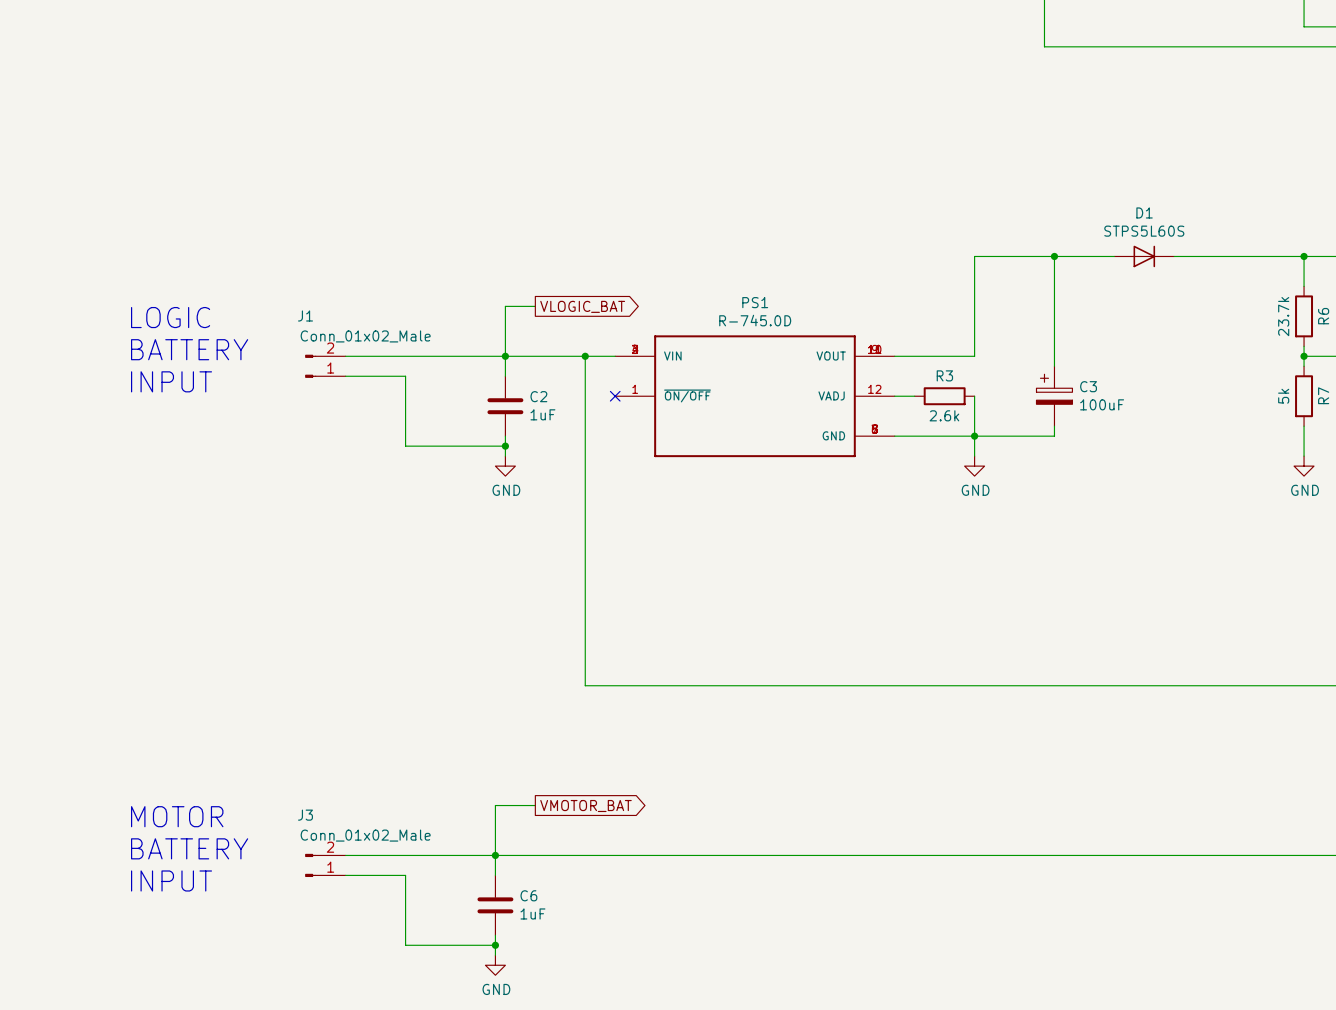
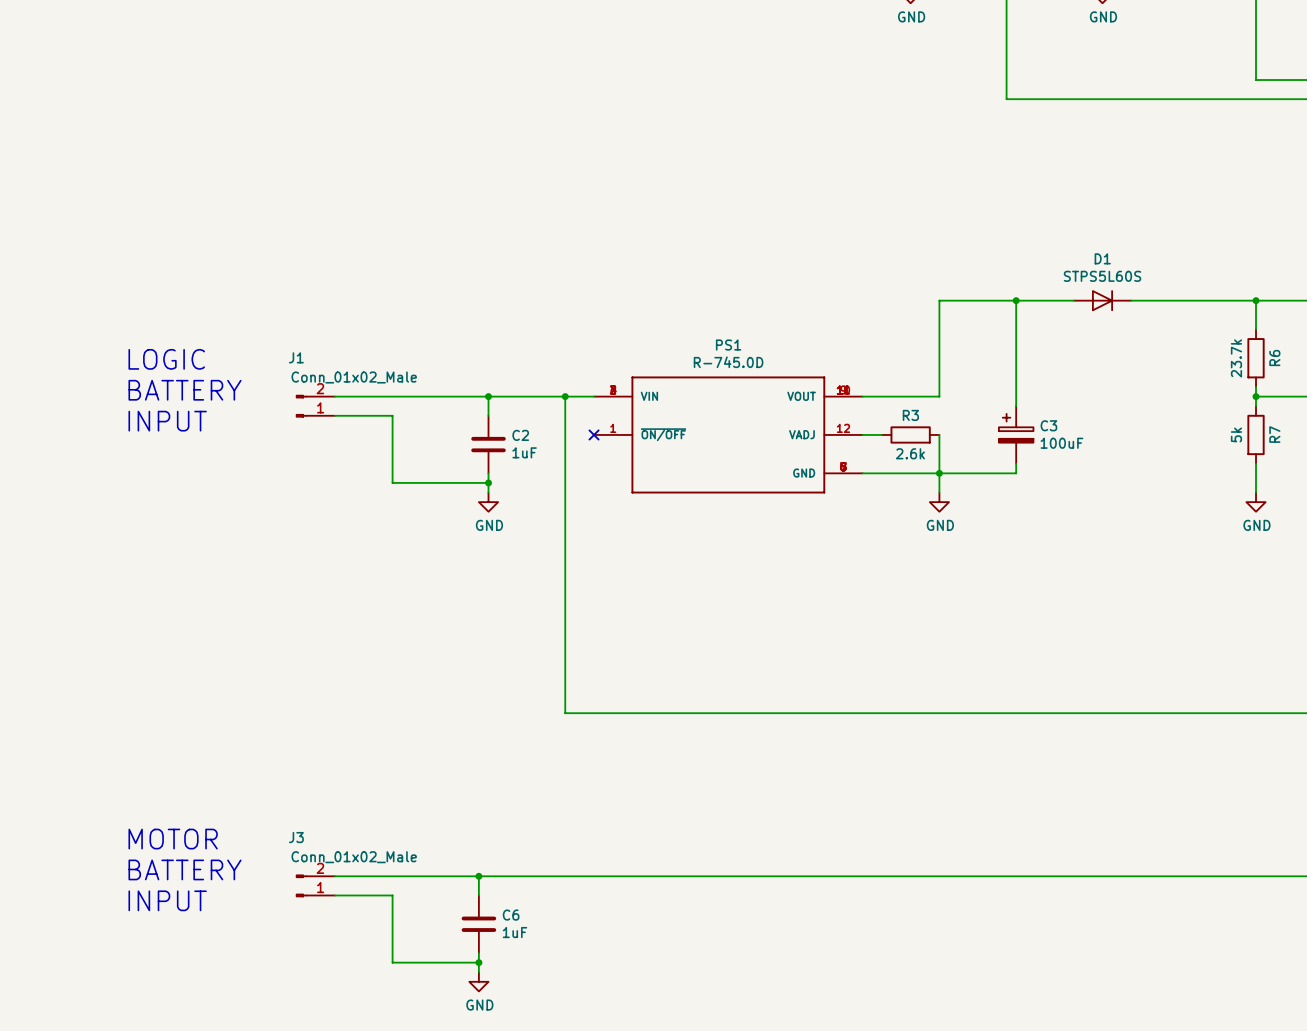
wire: (535, 306) (505, 306) (505, 356) -> none
global label: VLOGIC_BAT (582, 306) -> none
wire: (535, 805) (495, 805) (495, 855) -> none
global label: VMOTOR_BAT (585, 806) -> none

